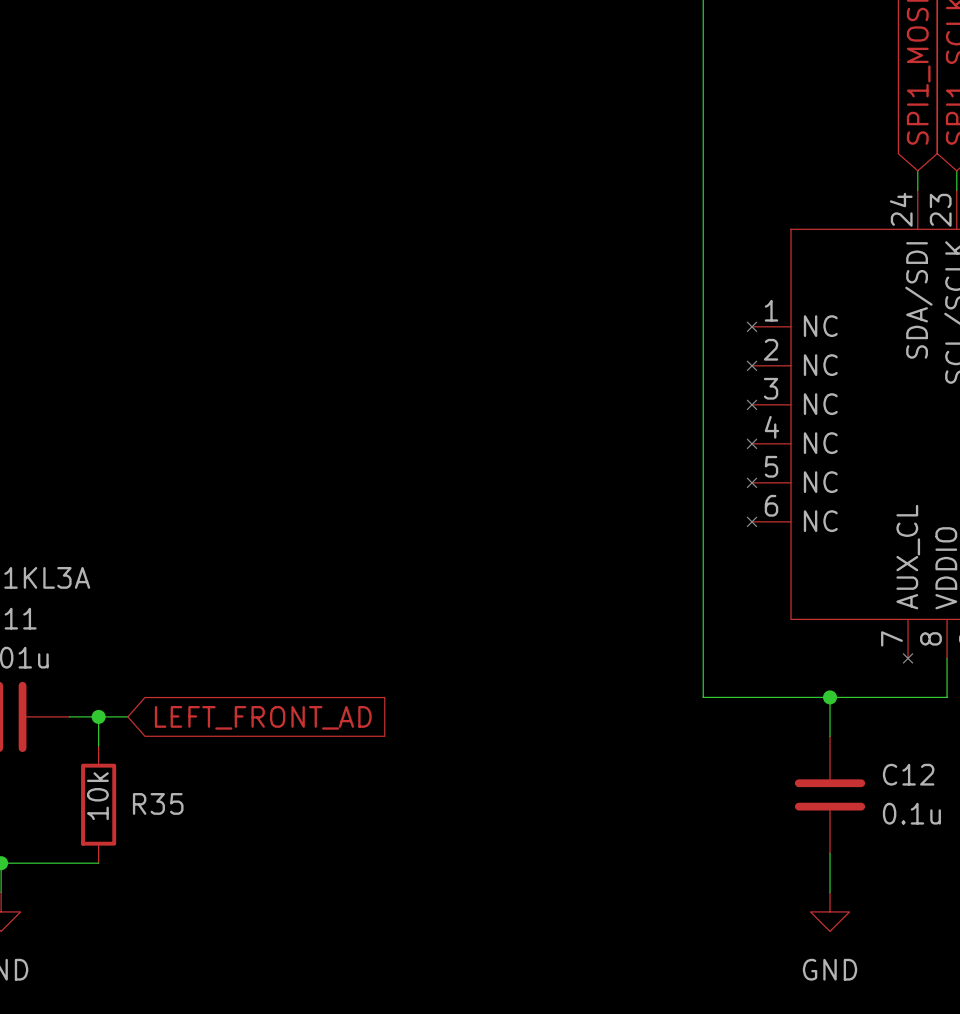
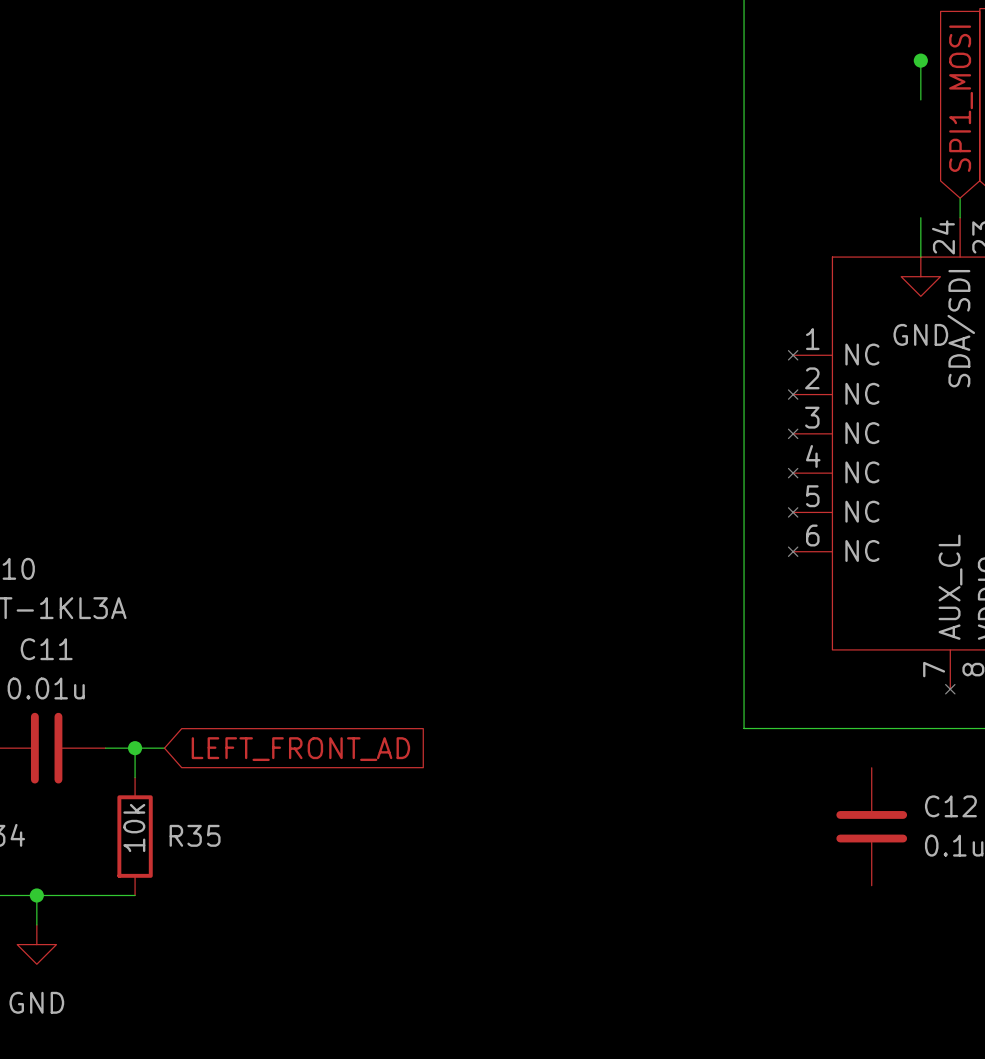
wire: none -> (920, 60) (920, 99)
junction: none -> (920, 60)
wire: none -> (920, 217) (920, 257)
power symbol: none -> GND (920, 276)
wire: (830, 697) (830, 736) -> none
junction: (830, 697) -> none
wire: (830, 853) (830, 892) -> none
power symbol: GND (830, 911) -> none

